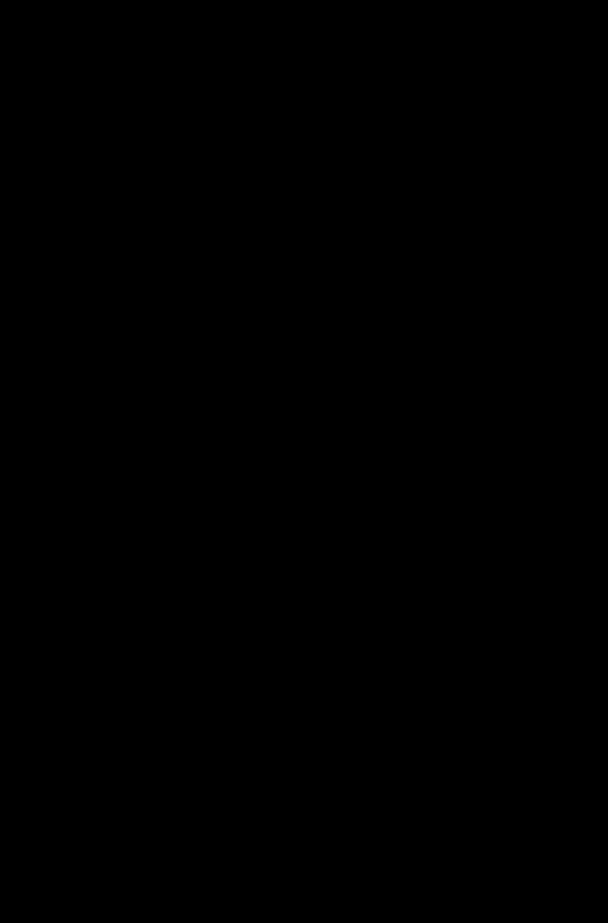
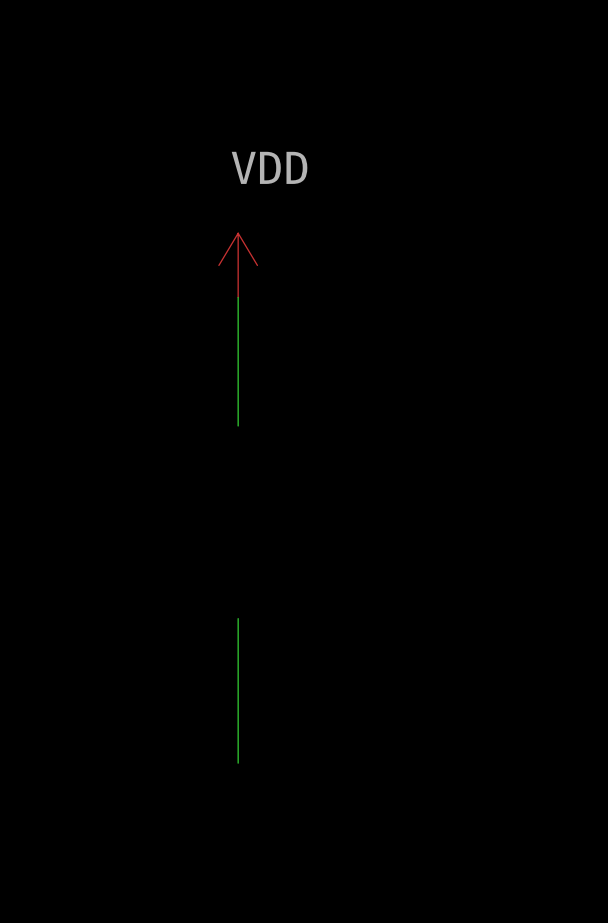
power symbol: none -> VDD (238, 265)
wire: none -> (238, 297) (238, 425)
wire: none -> (238, 618) (238, 763)

